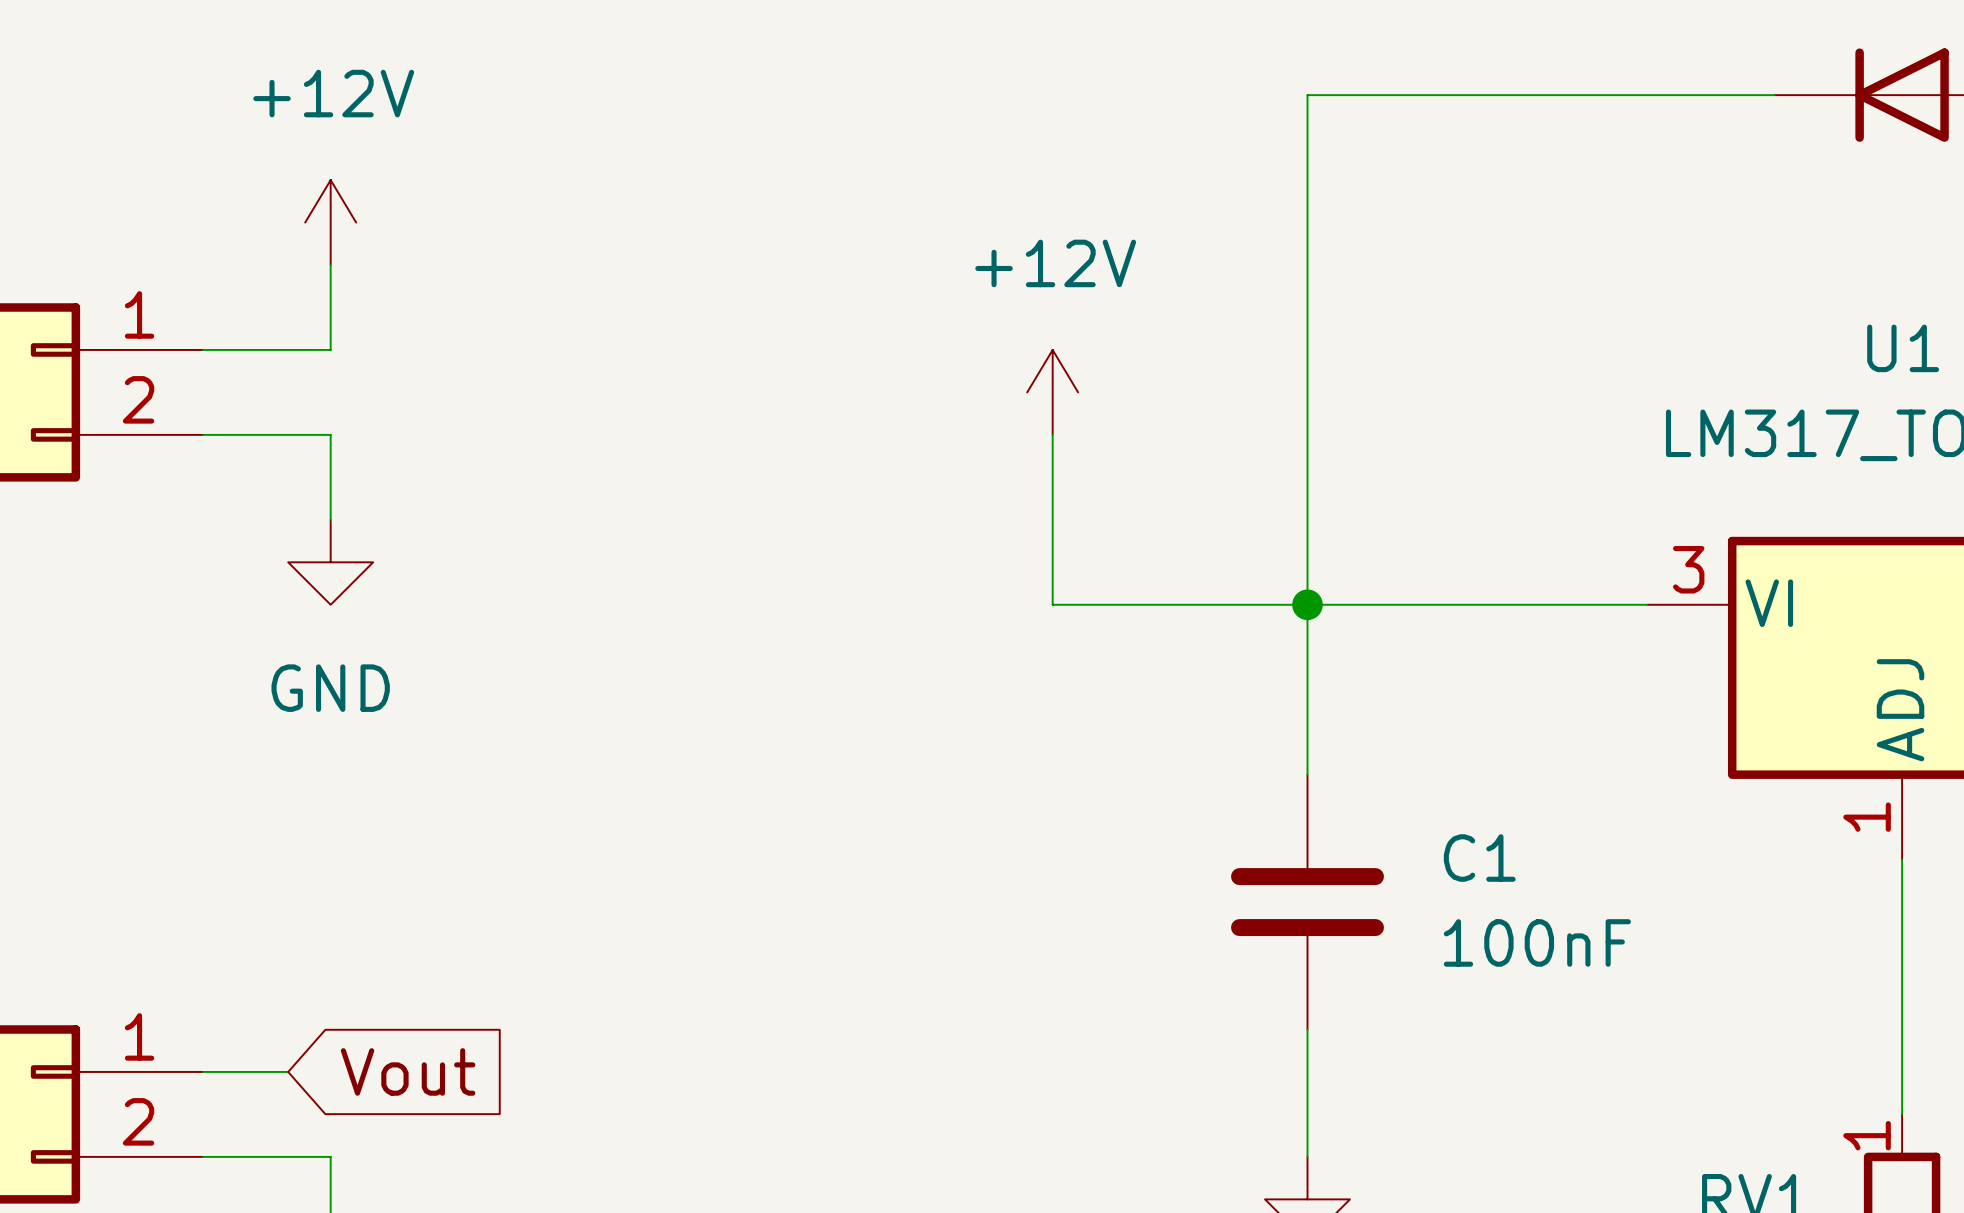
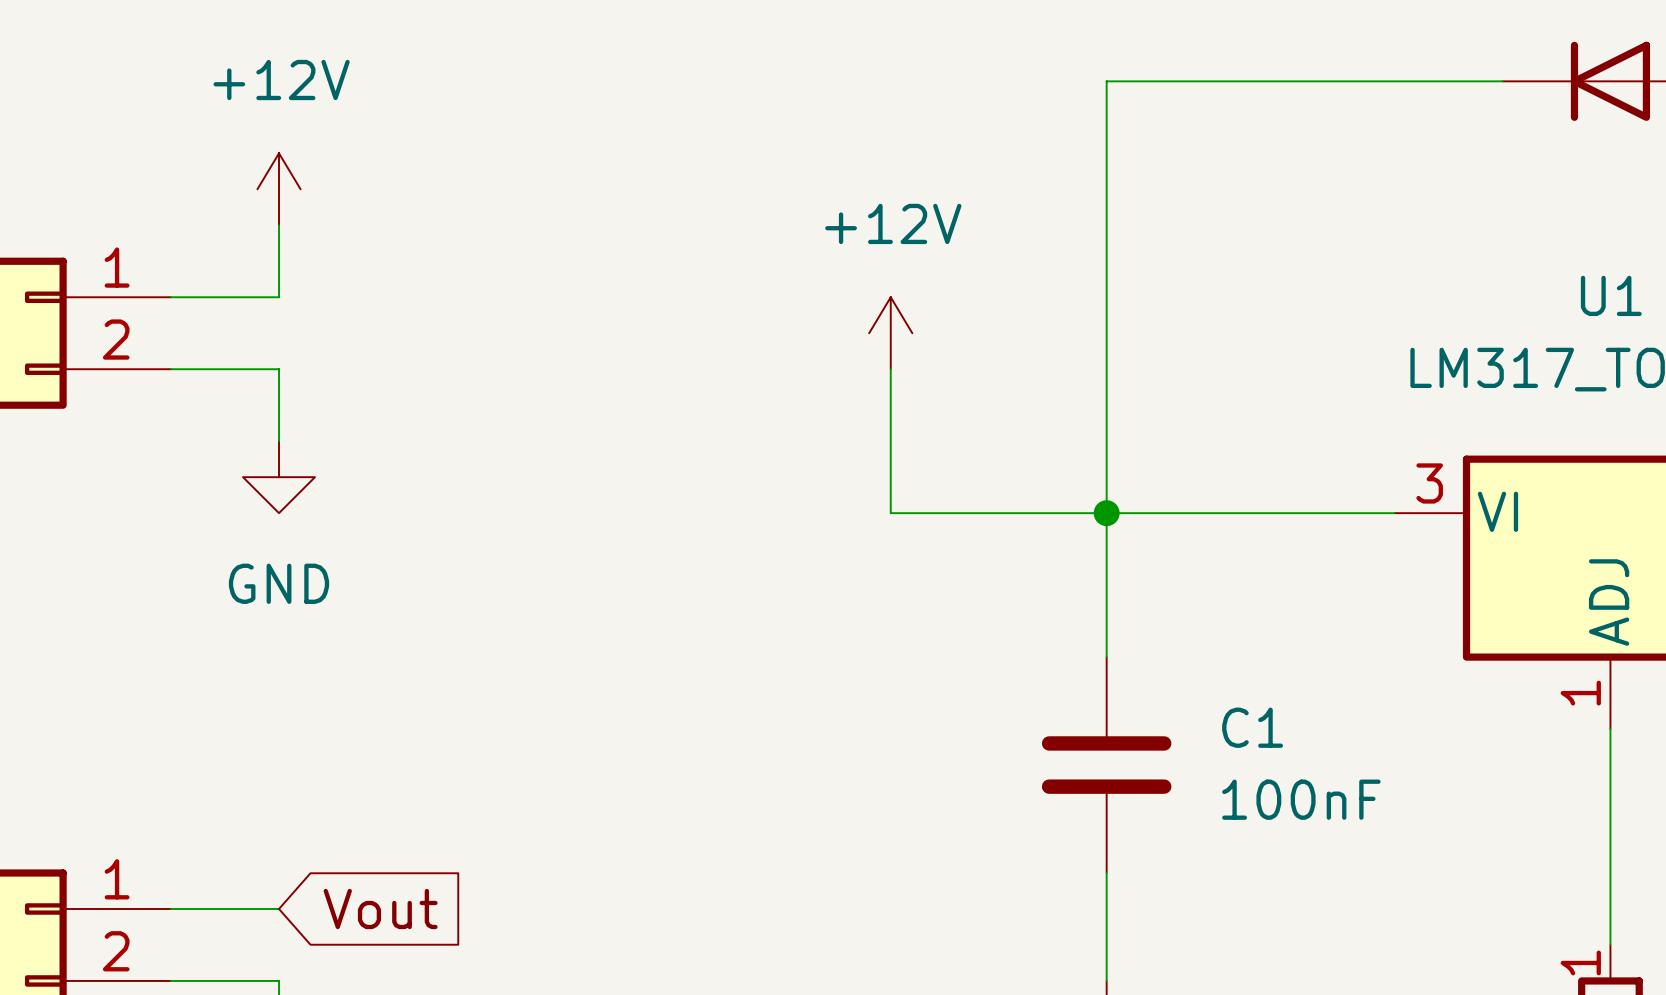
wire: none -> (243, 908) (279, 908)
global label position: Vout (408, 1071) -> Vout (380, 908)

